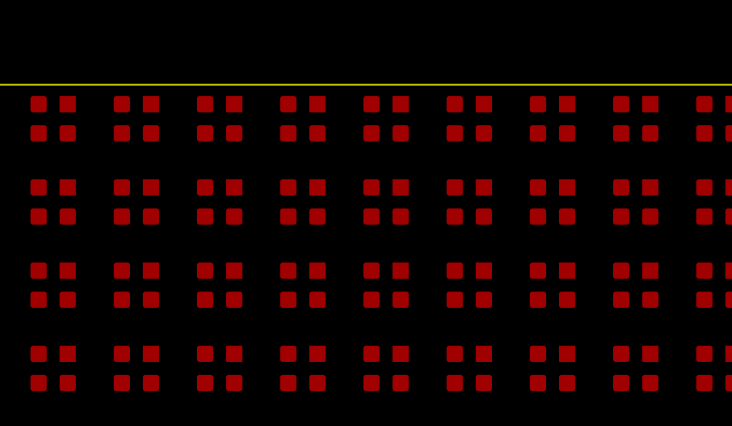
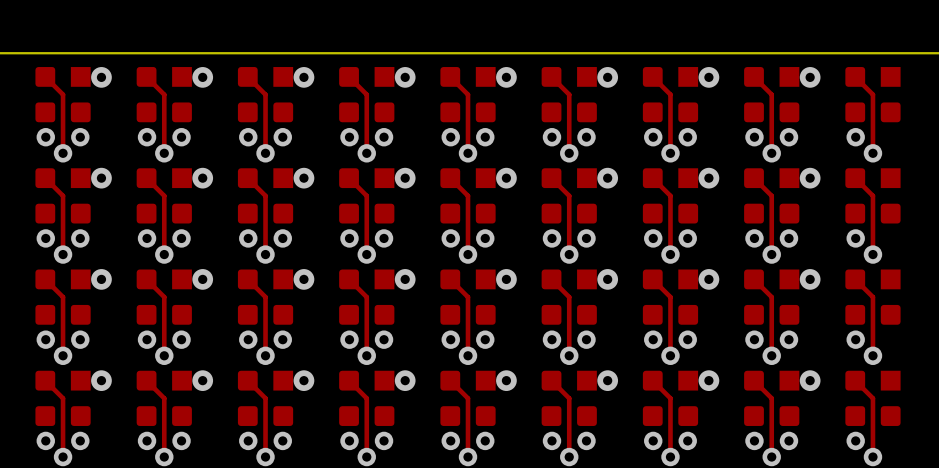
top track: none -> (45, 76) (63, 94) (63, 153)
via: none -> (101, 77)
top track: none -> (146, 76) (164, 94) (164, 153)
via: none -> (202, 77)
top track: none -> (247, 76) (265, 94) (265, 153)
via: none -> (303, 77)
top track: none -> (349, 76) (366, 94) (366, 153)
via: none -> (405, 77)
top track: none -> (450, 76) (468, 94) (468, 153)
via: none -> (506, 77)
top track: none -> (551, 76) (569, 94) (569, 153)
via: none -> (607, 77)
top track: none -> (652, 76) (670, 94) (670, 153)
via: none -> (708, 77)
top track: none -> (754, 76) (771, 94) (771, 153)
via: none -> (810, 77)
top track: none -> (855, 76) (872, 94) (872, 153)
via: none -> (45, 137)
via: none -> (80, 137)
via: none -> (147, 137)
via: none -> (181, 137)
via: none -> (248, 137)
via: none -> (282, 137)
via: none -> (349, 137)
via: none -> (384, 137)
via: none -> (450, 137)
via: none -> (485, 137)
via: none -> (551, 137)
via: none -> (586, 137)
via: none -> (653, 137)
via: none -> (687, 137)
via: none -> (754, 137)
via: none -> (788, 137)
via: none -> (855, 137)
via: none -> (63, 153)
via: none -> (164, 153)
via: none -> (265, 153)
via: none -> (366, 153)
via: none -> (468, 153)
via: none -> (569, 153)
via: none -> (670, 153)
via: none -> (771, 153)
via: none -> (872, 153)
top track: none -> (45, 178) (63, 195) (63, 254)
via: none -> (101, 178)
top track: none -> (146, 178) (164, 195) (164, 254)
via: none -> (202, 178)
top track: none -> (247, 178) (265, 195) (265, 254)
via: none -> (303, 178)
top track: none -> (349, 178) (366, 195) (366, 254)
via: none -> (405, 178)
top track: none -> (450, 178) (468, 195) (468, 254)
via: none -> (506, 178)
top track: none -> (551, 178) (569, 195) (569, 254)
via: none -> (607, 178)
top track: none -> (652, 178) (670, 195) (670, 254)
via: none -> (708, 178)
top track: none -> (754, 178) (771, 195) (771, 254)
via: none -> (810, 178)
top track: none -> (855, 178) (872, 195) (872, 254)
via: none -> (45, 238)
via: none -> (80, 238)
via: none -> (147, 238)
via: none -> (181, 238)
via: none -> (248, 238)
via: none -> (282, 238)
via: none -> (349, 238)
via: none -> (384, 238)
via: none -> (450, 238)
via: none -> (485, 238)
via: none -> (551, 238)
via: none -> (586, 238)
via: none -> (653, 238)
via: none -> (687, 238)
via: none -> (754, 238)
via: none -> (788, 238)
via: none -> (855, 238)
via: none -> (63, 254)
via: none -> (164, 254)
via: none -> (265, 254)
via: none -> (366, 254)
via: none -> (468, 254)
via: none -> (569, 254)
via: none -> (670, 254)
via: none -> (771, 254)
via: none -> (872, 254)
top track: none -> (45, 279) (63, 297) (63, 355)
via: none -> (101, 279)
top track: none -> (146, 279) (164, 297) (164, 355)
via: none -> (202, 279)
top track: none -> (247, 279) (265, 297) (265, 355)
via: none -> (303, 279)
top track: none -> (349, 279) (366, 297) (366, 355)
via: none -> (405, 279)
top track: none -> (450, 279) (468, 297) (468, 355)
via: none -> (506, 279)
top track: none -> (551, 279) (569, 297) (569, 355)
via: none -> (607, 279)
top track: none -> (652, 279) (670, 297) (670, 355)
via: none -> (708, 279)
top track: none -> (754, 279) (771, 297) (771, 355)
via: none -> (810, 279)
top track: none -> (855, 279) (872, 297) (872, 355)
via: none -> (45, 339)
via: none -> (80, 339)
via: none -> (147, 339)
via: none -> (181, 339)
via: none -> (248, 339)
via: none -> (282, 339)
via: none -> (349, 339)
via: none -> (384, 339)
via: none -> (450, 339)
via: none -> (485, 339)
via: none -> (551, 339)
via: none -> (586, 339)
via: none -> (653, 339)
via: none -> (687, 339)
via: none -> (754, 339)
via: none -> (788, 339)
via: none -> (855, 339)
via: none -> (63, 355)
via: none -> (164, 355)
via: none -> (265, 355)
via: none -> (366, 355)
via: none -> (468, 355)
via: none -> (569, 355)
via: none -> (670, 355)
via: none -> (771, 355)
via: none -> (872, 355)
top track: none -> (45, 380) (63, 398) (63, 457)
via: none -> (101, 380)
top track: none -> (146, 380) (164, 398) (164, 457)
via: none -> (202, 380)
top track: none -> (247, 380) (265, 398) (265, 457)
via: none -> (303, 380)
top track: none -> (349, 380) (366, 398) (366, 457)
via: none -> (405, 380)
top track: none -> (450, 380) (468, 398) (468, 457)
via: none -> (506, 380)
top track: none -> (551, 380) (569, 398) (569, 457)
via: none -> (607, 380)
top track: none -> (652, 380) (670, 398) (670, 457)
via: none -> (708, 380)
top track: none -> (754, 380) (771, 398) (771, 457)
via: none -> (810, 380)
top track: none -> (855, 380) (872, 398) (872, 457)
via: none -> (45, 440)
via: none -> (80, 440)
via: none -> (147, 440)
via: none -> (181, 440)
via: none -> (248, 440)
via: none -> (282, 440)
via: none -> (349, 440)
via: none -> (384, 440)
via: none -> (450, 440)
via: none -> (485, 440)
via: none -> (551, 440)
via: none -> (586, 440)
via: none -> (653, 440)
via: none -> (687, 440)
via: none -> (754, 440)
via: none -> (788, 440)
via: none -> (855, 440)
via: none -> (63, 457)
via: none -> (164, 457)
via: none -> (265, 457)
via: none -> (366, 457)
via: none -> (468, 457)
via: none -> (569, 457)
via: none -> (670, 457)
via: none -> (771, 457)
via: none -> (872, 457)

